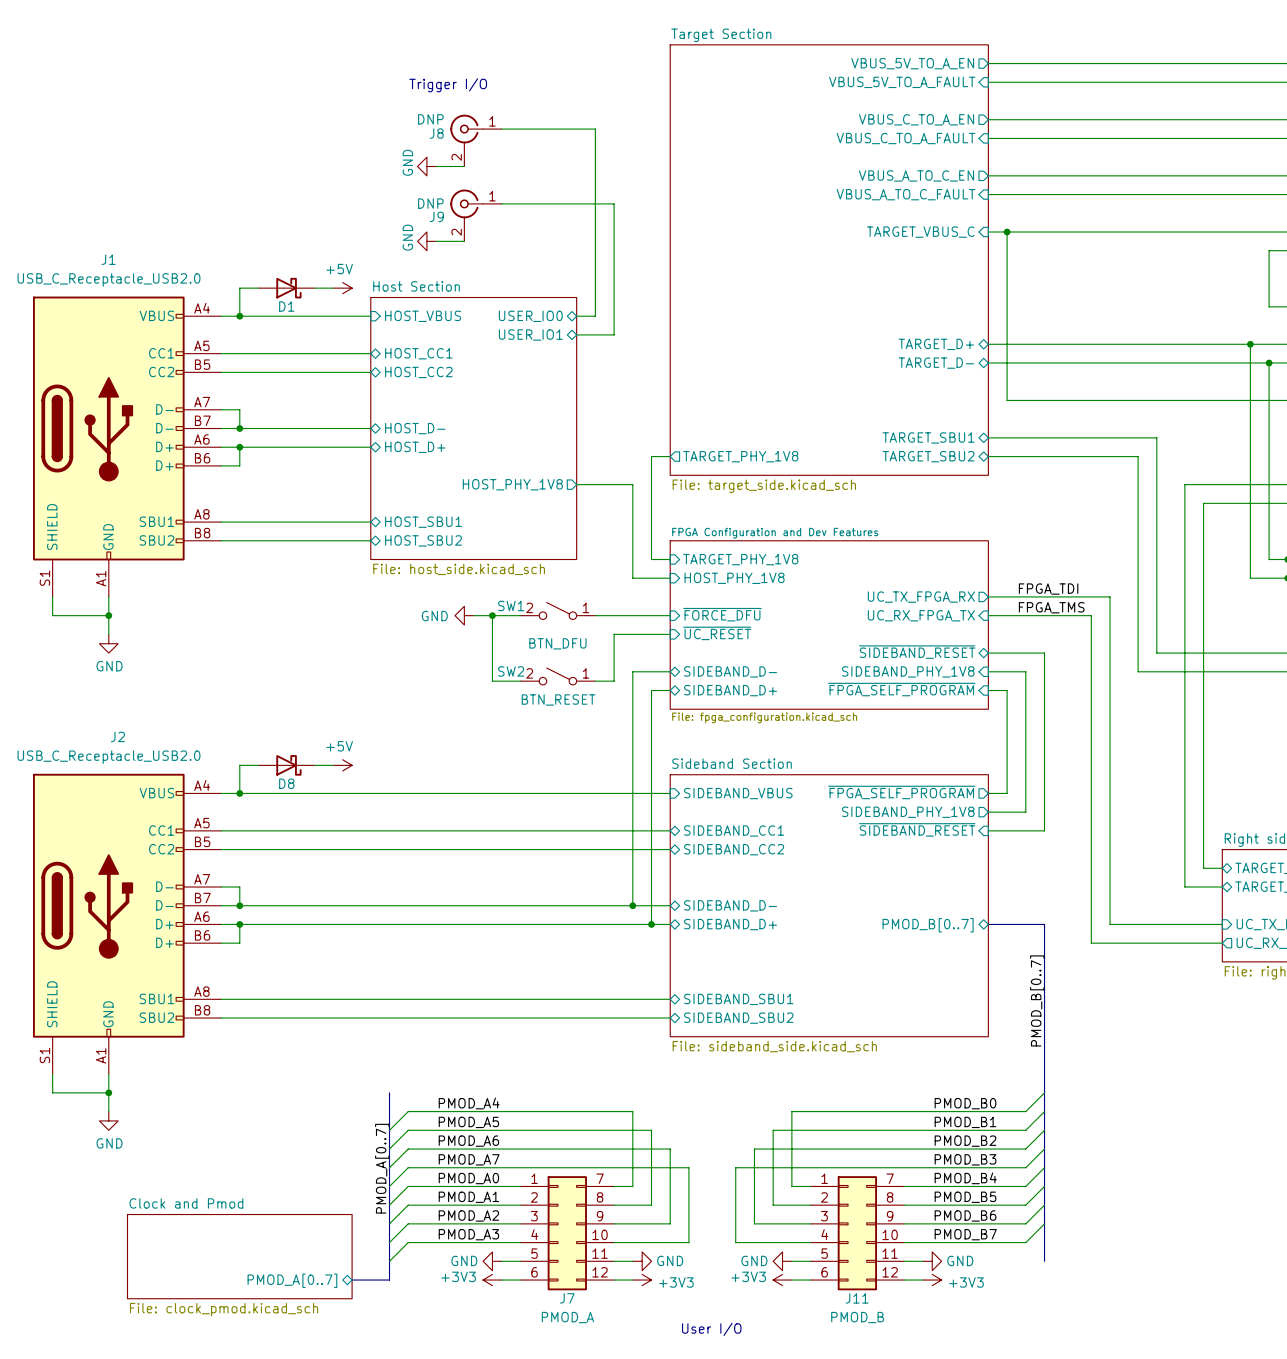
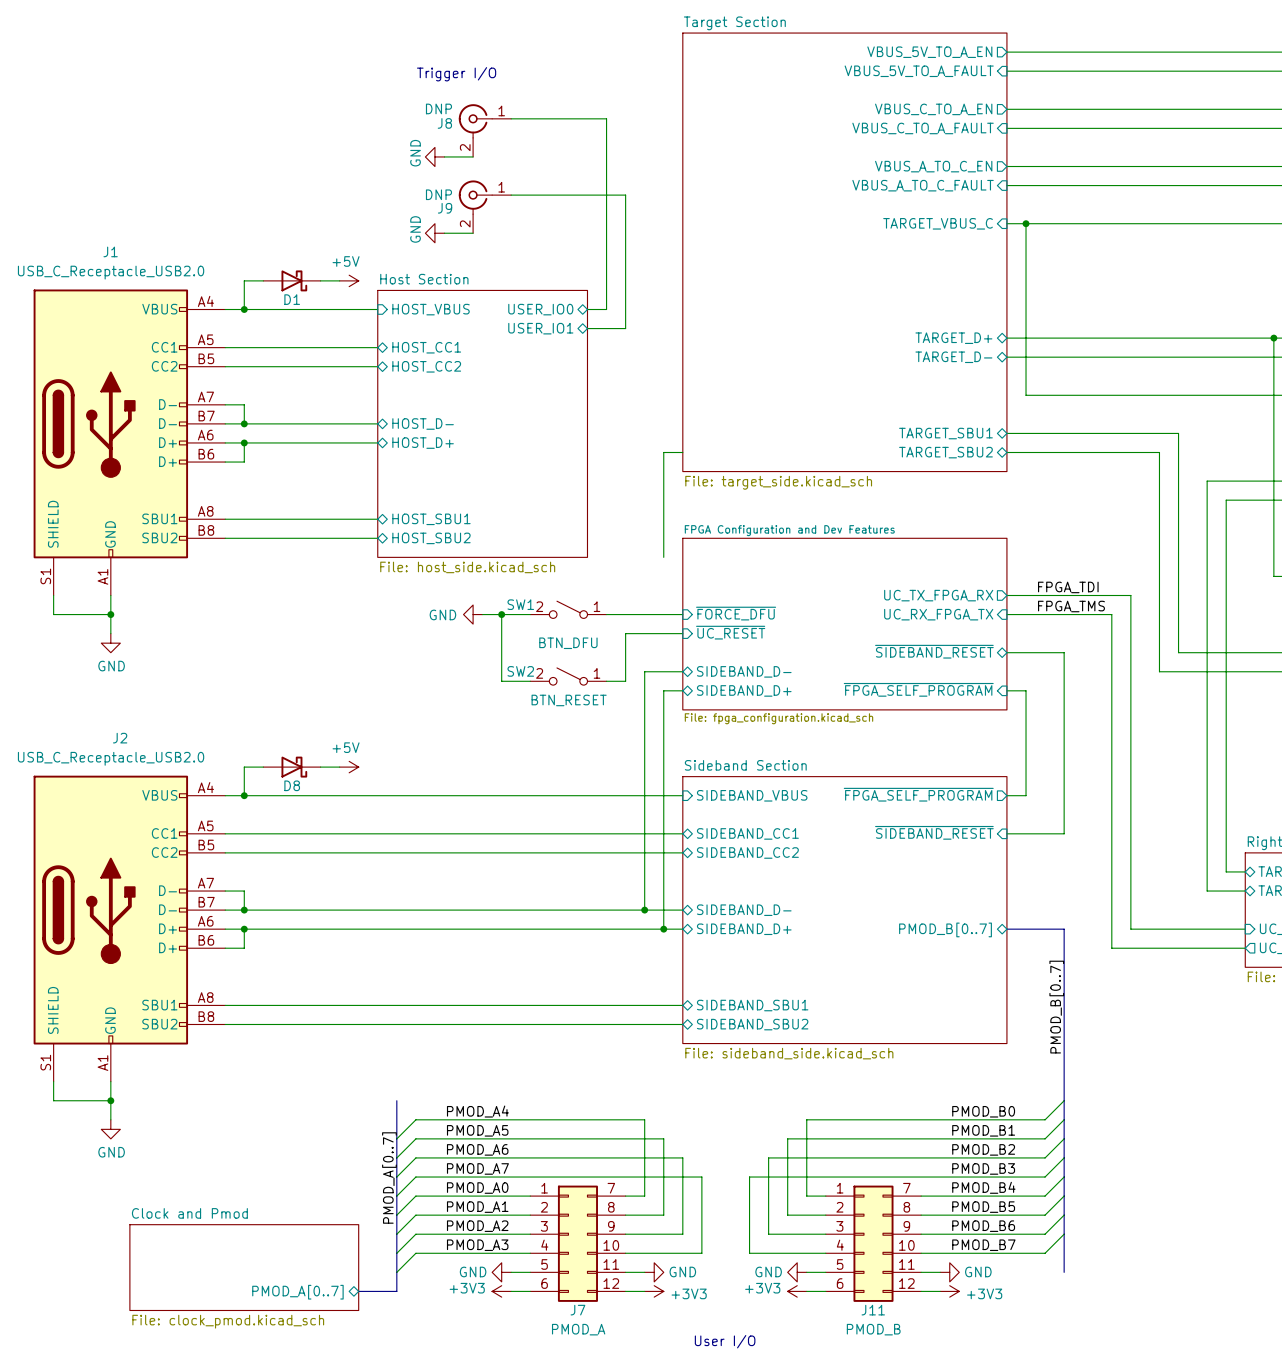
sheet pin: TARGET_PHY_1V8 (740, 456) -> none
sheet pin: HOST_PHY_1V8 (512, 484) -> none
wire: (576, 484) (632, 484) (632, 578) (670, 578) -> none
wire: (651, 559) (670, 559) -> none
sheet pin: TARGET_PHY_1V8 (740, 559) -> none
sheet pin: HOST_PHY_1V8 (734, 578) -> none
sheet pin: SIDEBAND_PHY_1V8 (908, 671) -> none
wire: (988, 671) (1025, 671) (1025, 812) (988, 812) -> none
sheet pin: SIDEBAND_PHY_1V8 (908, 812) -> none

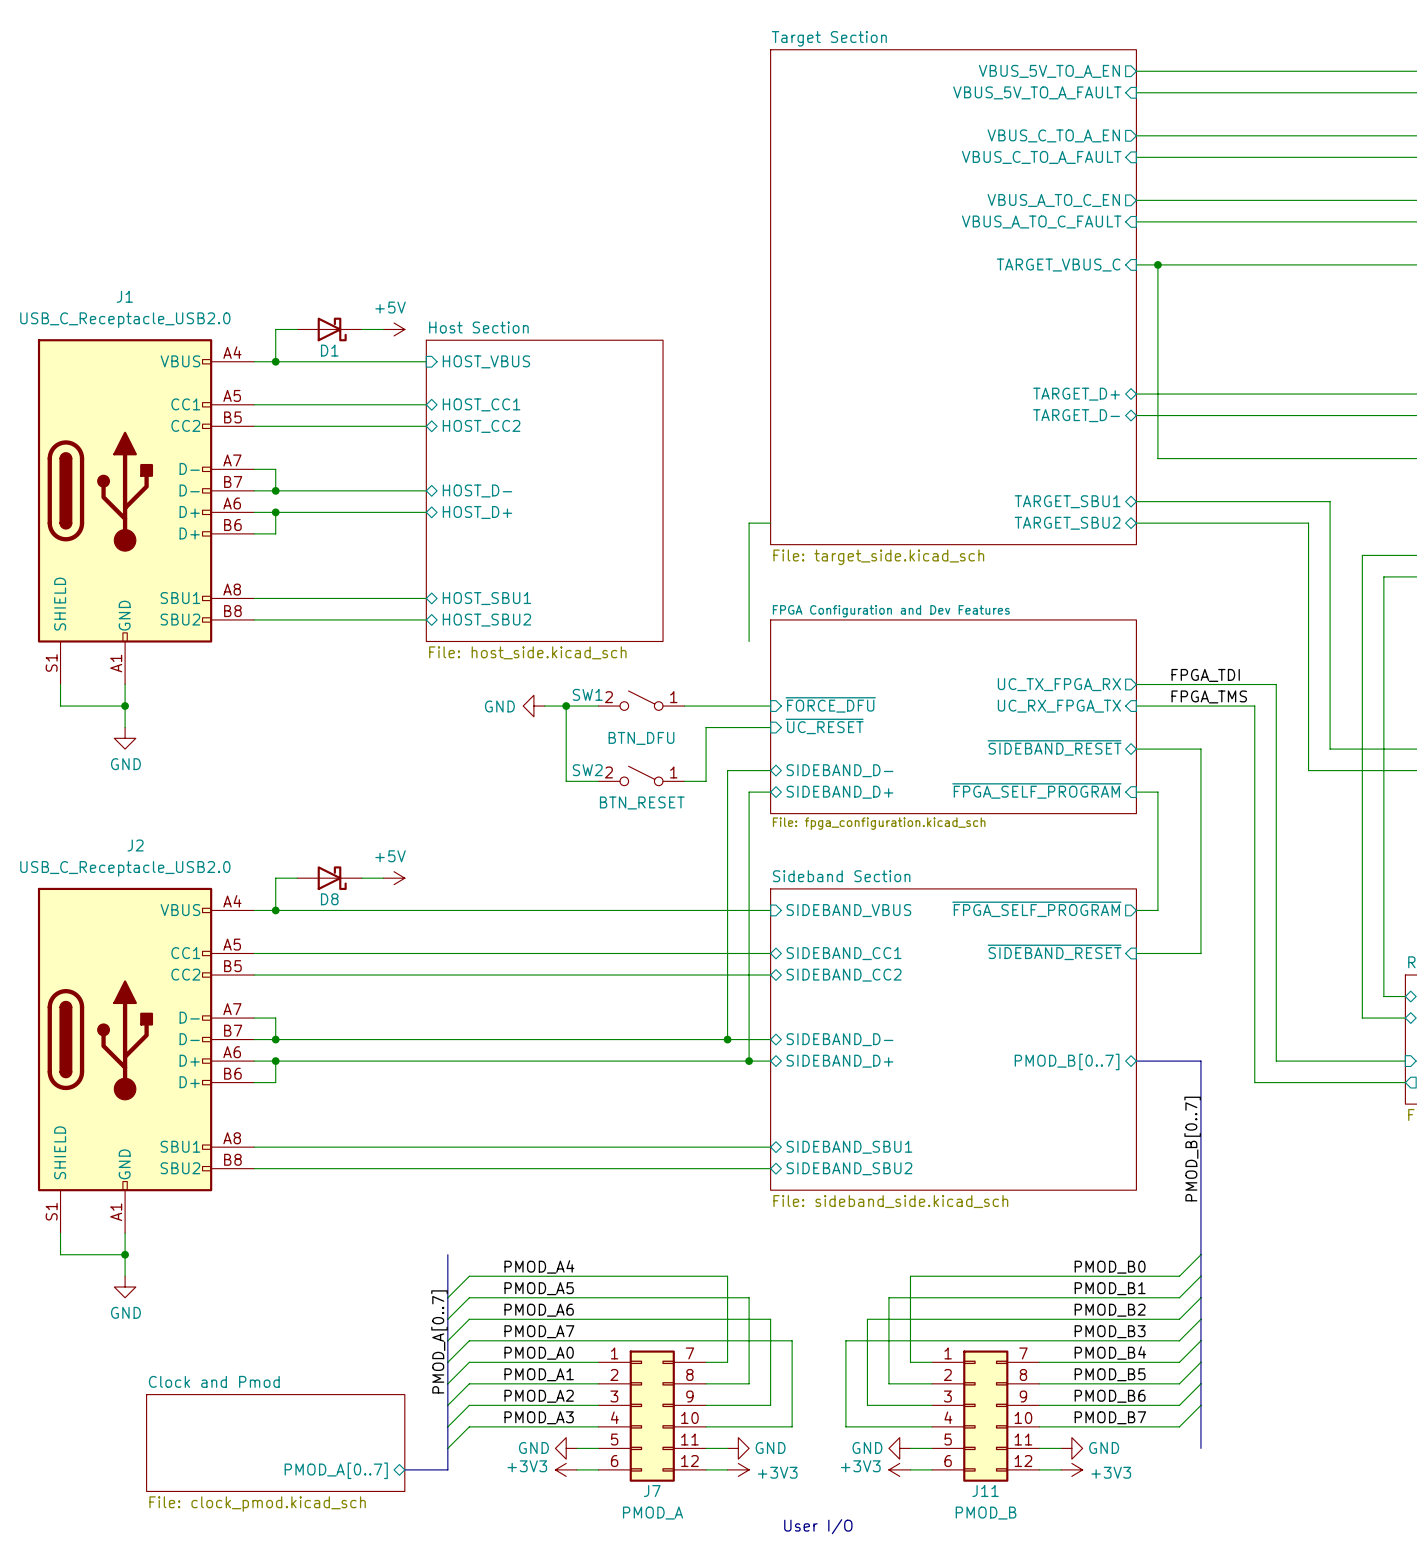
text: Trigger I/O (456, 74) -> none
wire: (511, 118) (606, 118) (606, 309) (587, 309) -> none
J8: (485, 130) -> none
power symbol: GND (434, 156) -> none
wire: (444, 156) (473, 156) -> none
wire: (511, 195) (625, 195) (625, 328) (587, 328) -> none
J9: (485, 206) -> none
power symbol: GND (434, 233) -> none
wire: (444, 233) (473, 233) -> none
sheet pin: USER_IO0 (540, 309) -> none
sheet pin: USER_IO1 (540, 328) -> none

